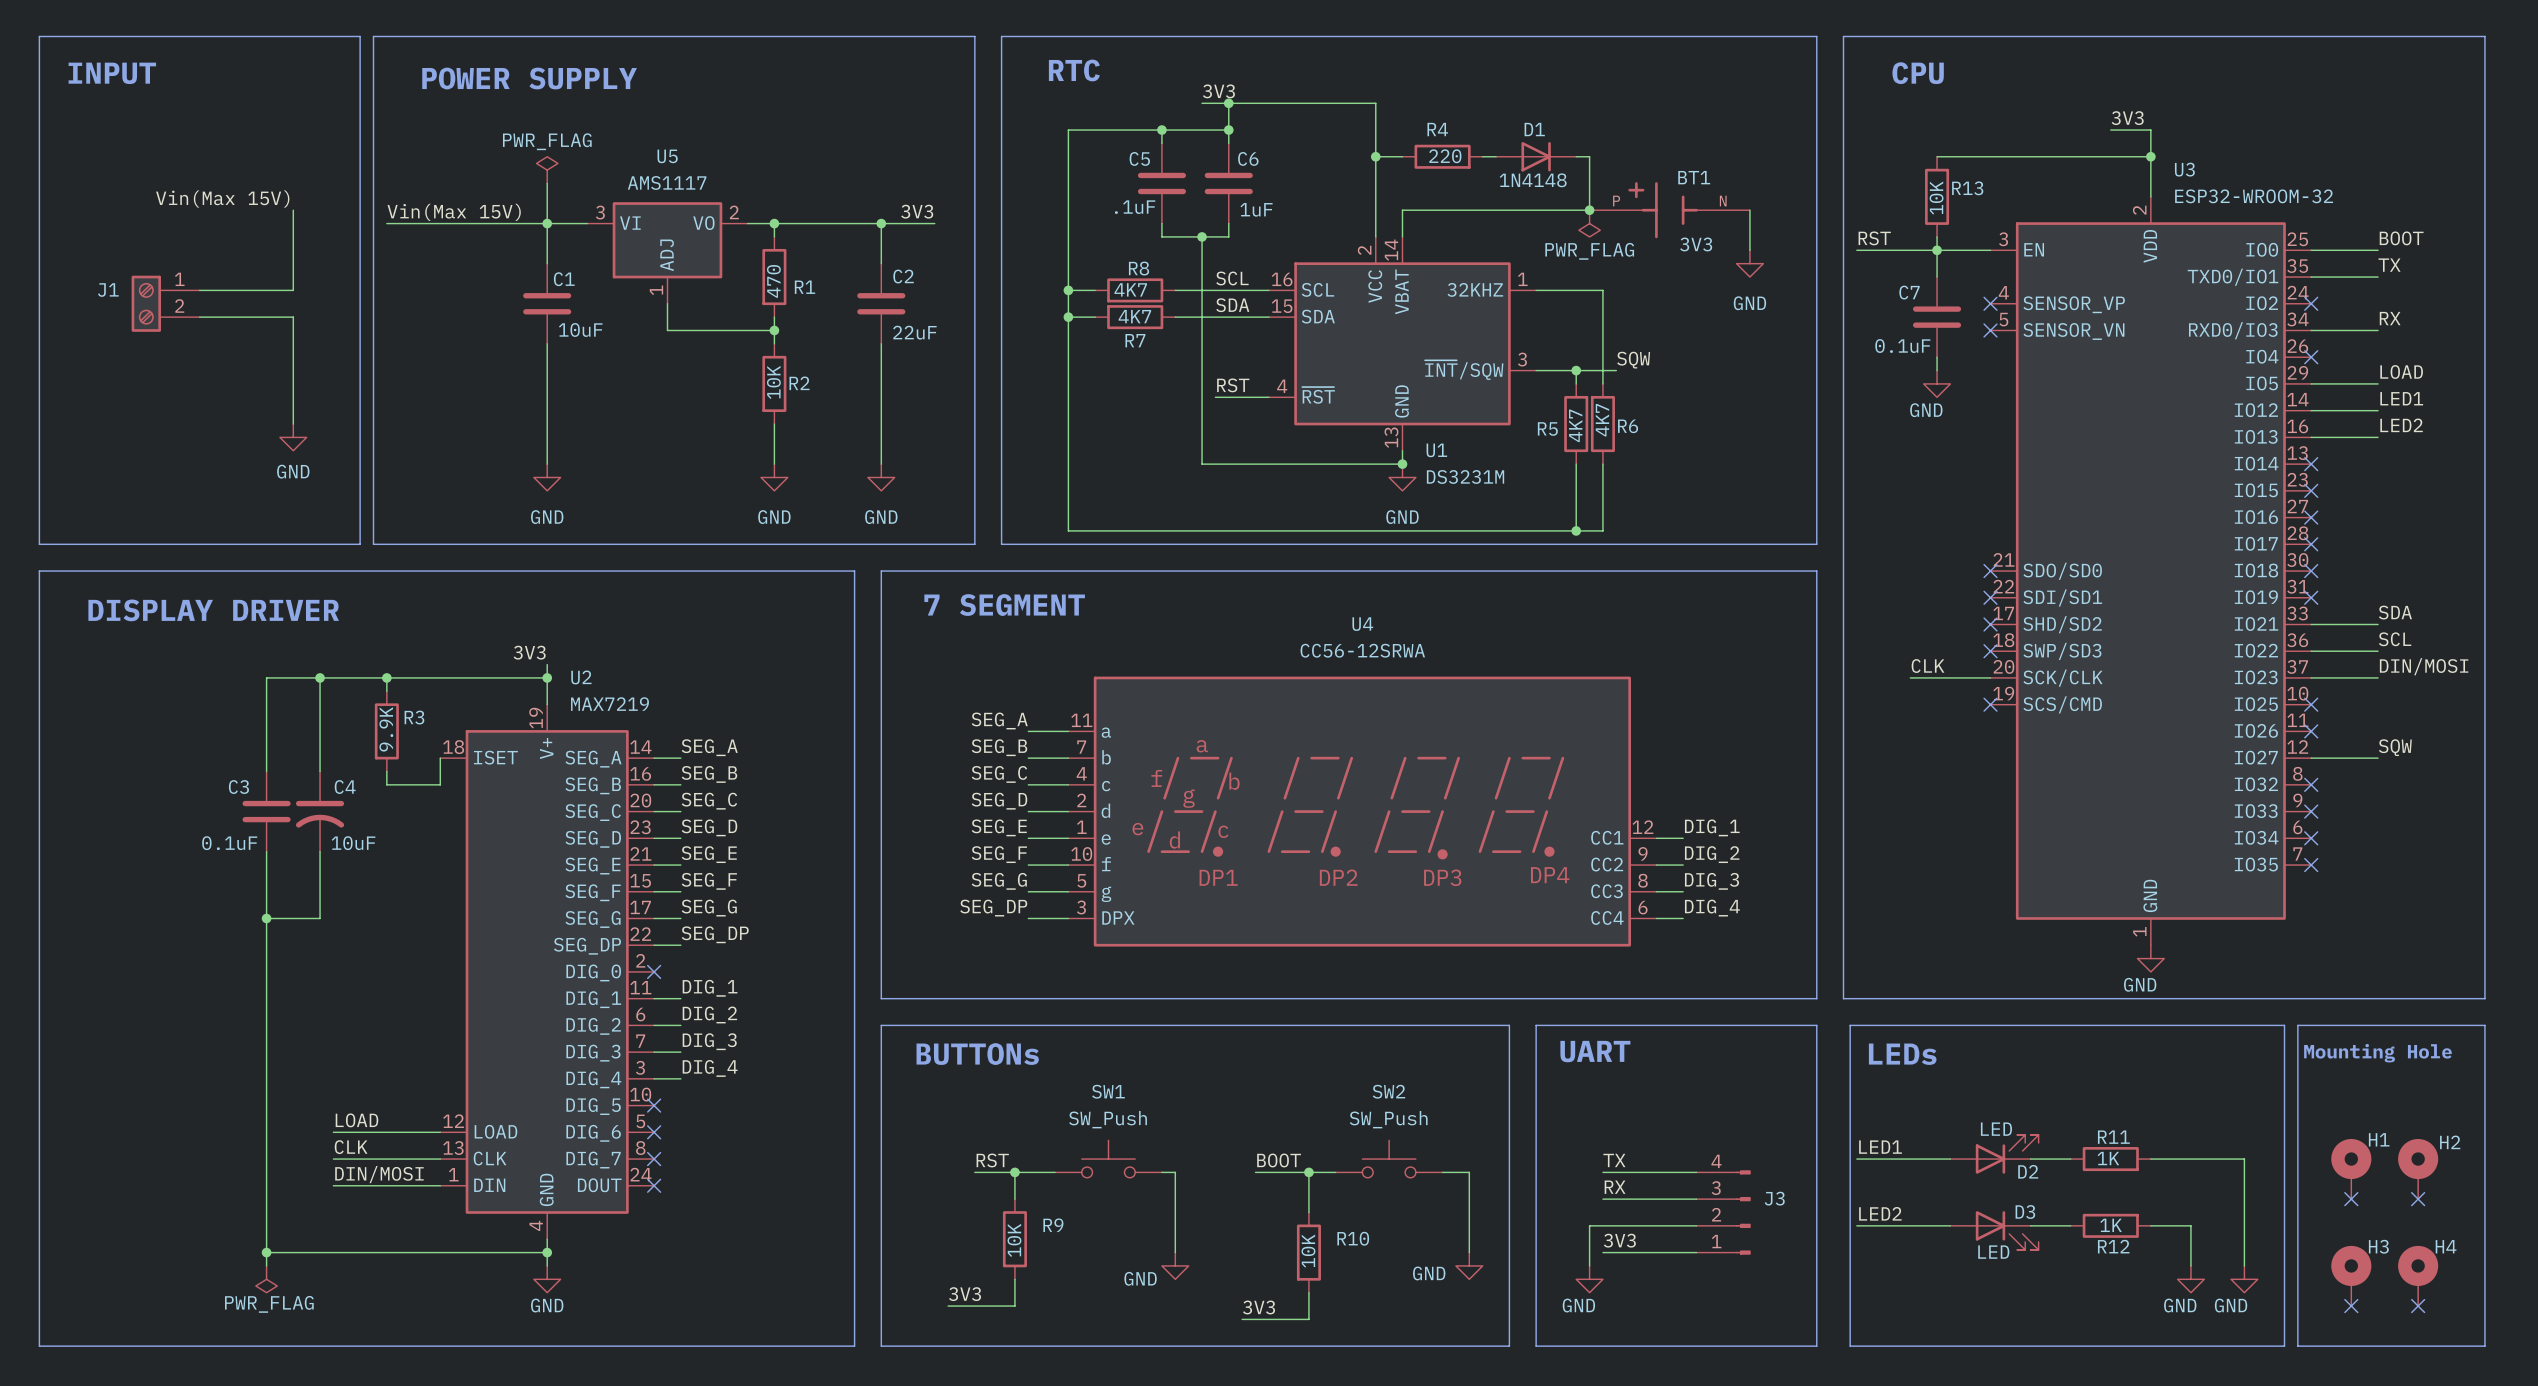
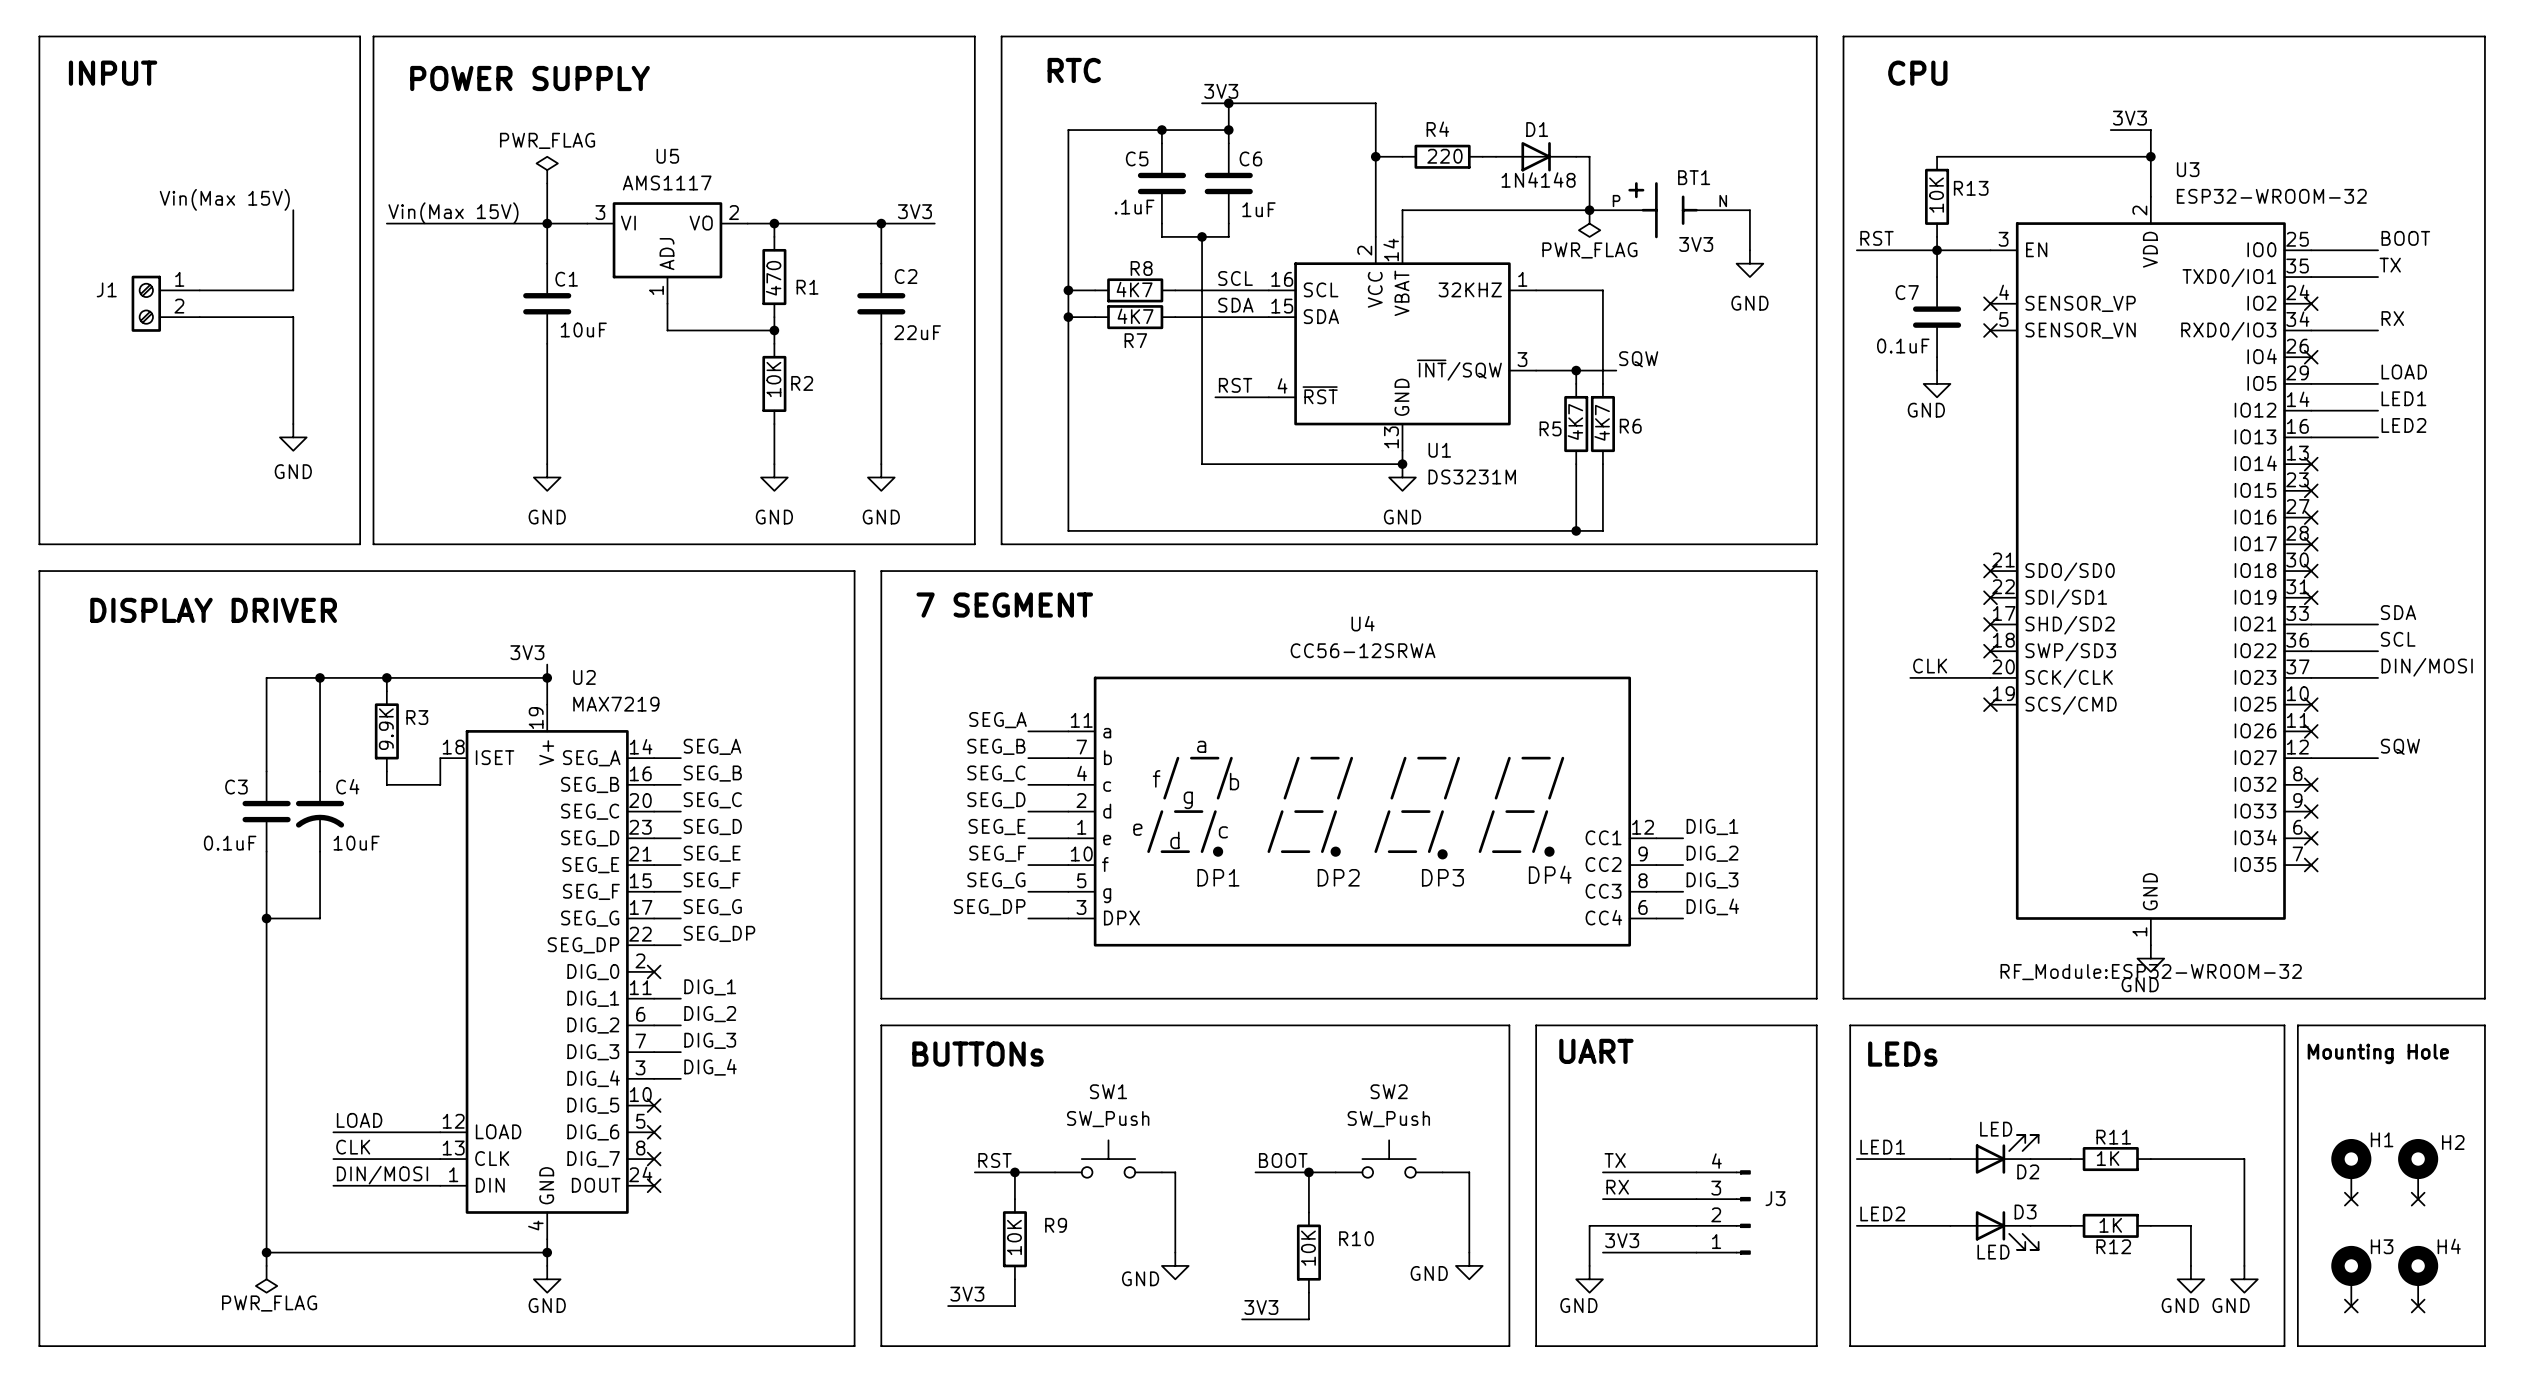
U3 text: none -> RF_Module:ESP32-WROOM-32 (2151, 972)

